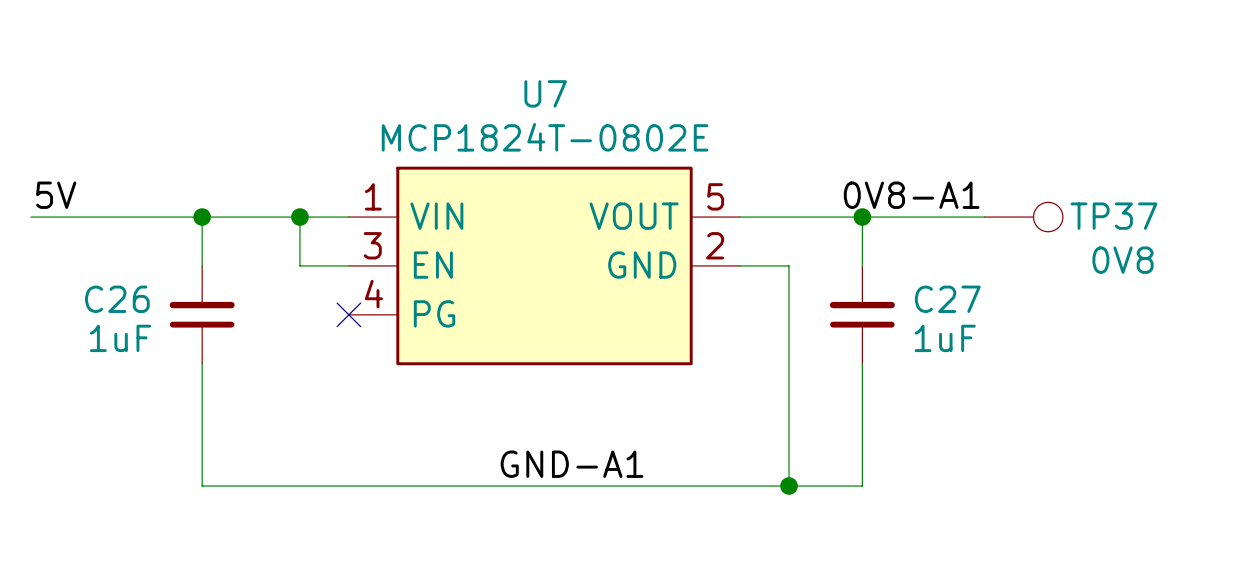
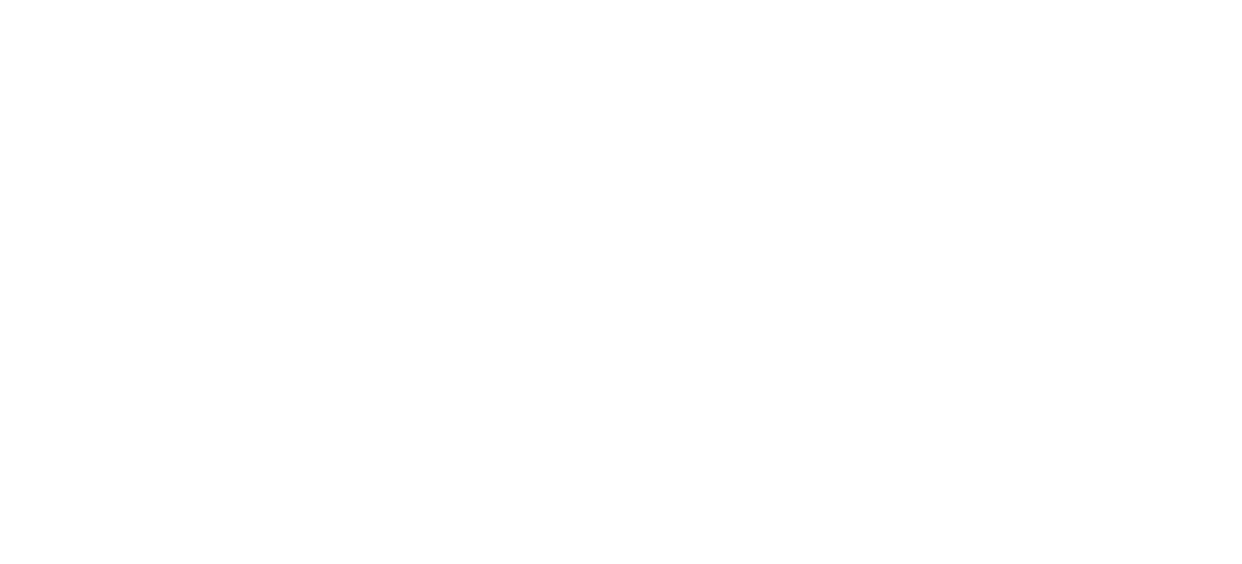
label: 5V (56, 195) -> none
label: 0V8-A1 (911, 195) -> none
wire: (31, 217) (348, 217) -> none
wire: (202, 217) (202, 265) -> none
junction: (202, 217) -> none
wire: (299, 217) (299, 265) (348, 265) -> none
junction: (299, 217) -> none
wire: (740, 217) (984, 217) -> none
wire: (862, 217) (862, 265) -> none
junction: (862, 217) -> none
TP37: 0V8 (1023, 217) -> none
U7: MCP1824T-0802E (544, 265) -> none
wire: (740, 265) (789, 265) (789, 486) -> none
C26: 1uF (202, 314) -> none
no-connect mark: (348, 314) -> none
C27: 1uF (862, 314) -> none
wire: (202, 363) (202, 486) (862, 486) (862, 363) -> none
label: GND-A1 (572, 464) -> none
junction: (789, 486) -> none

